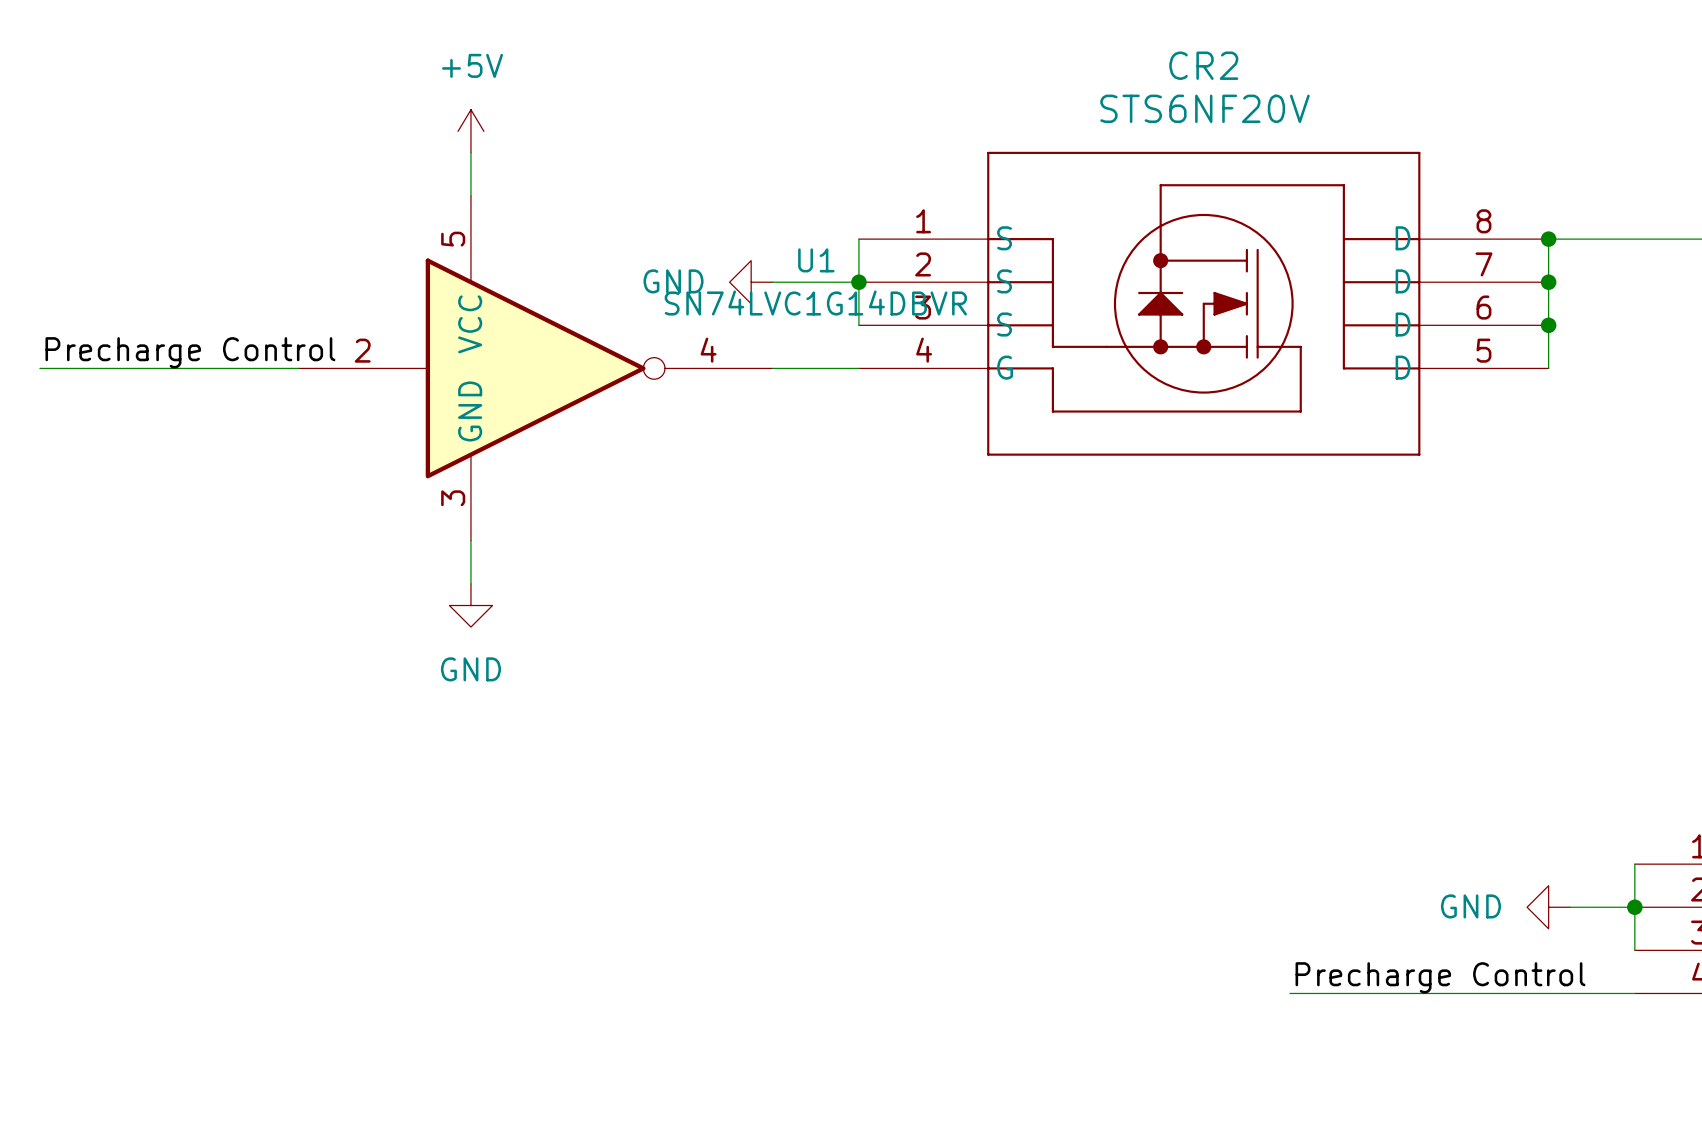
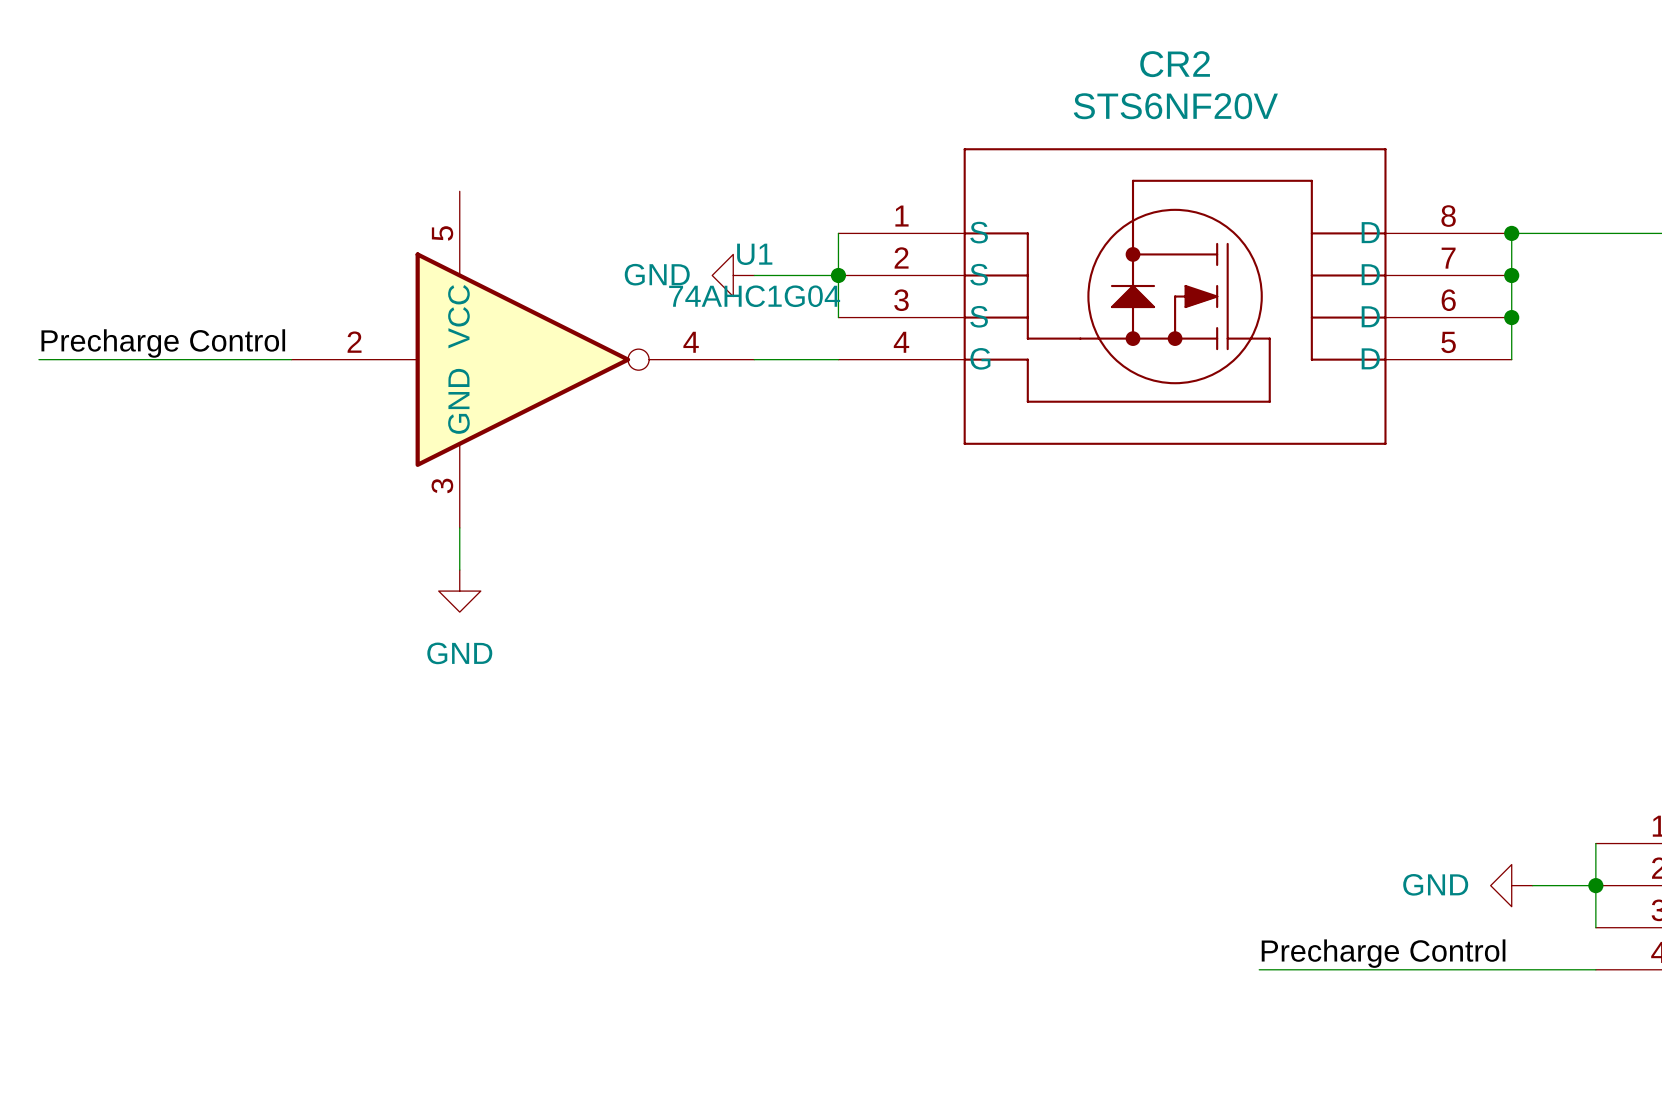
power symbol: +5V (470, 131) -> none
wire: (470, 152) (470, 196) -> none
U1 name position: U1 (816, 260) -> U1 (754, 254)
U1 value: SN74LVC1G14DBVR (815, 302) -> 74AHC1G04 (754, 296)

